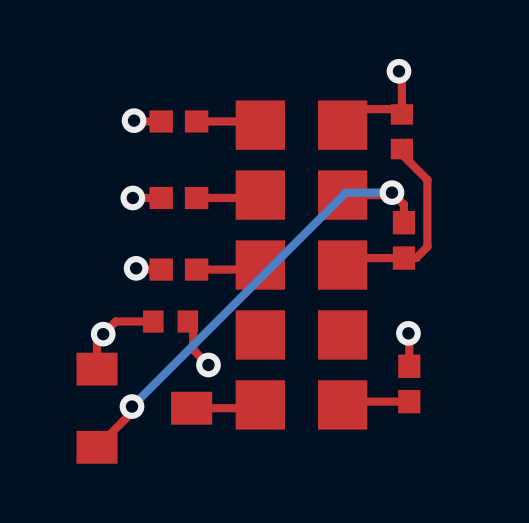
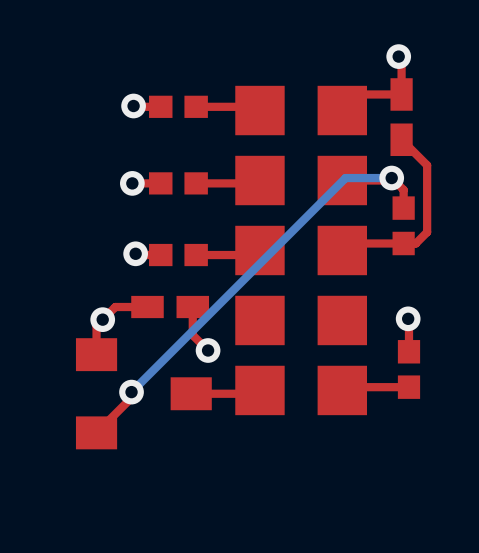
part footprint: [390, 104, 413, 160] -> [390, 78, 413, 157]
part footprint: [143, 310, 199, 333] -> [131, 295, 210, 319]

